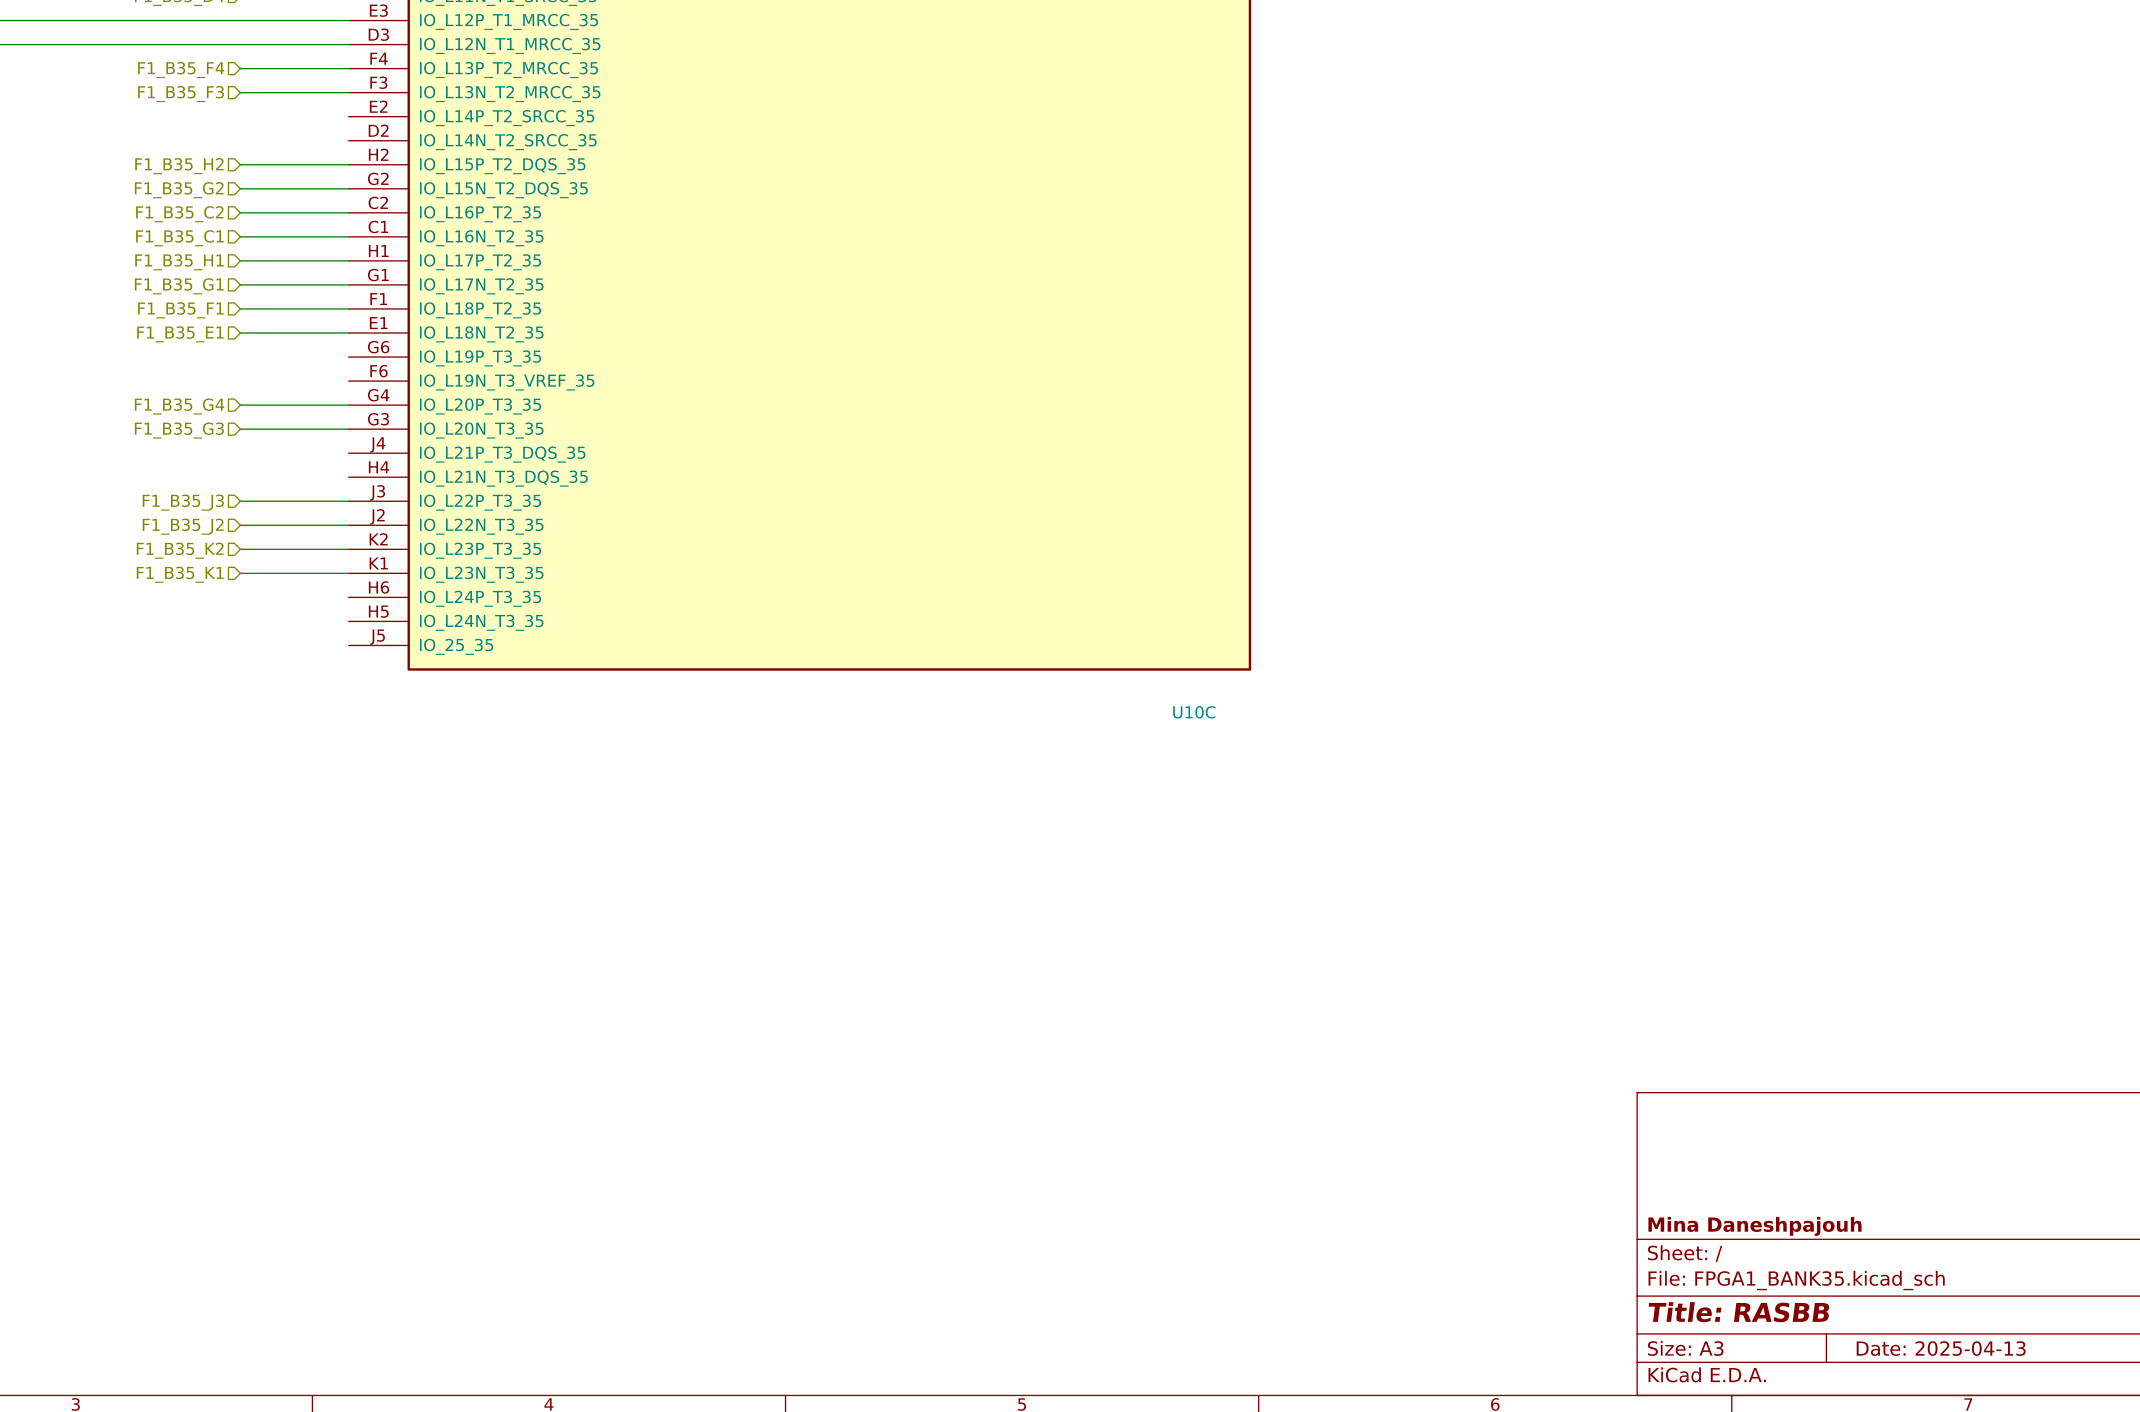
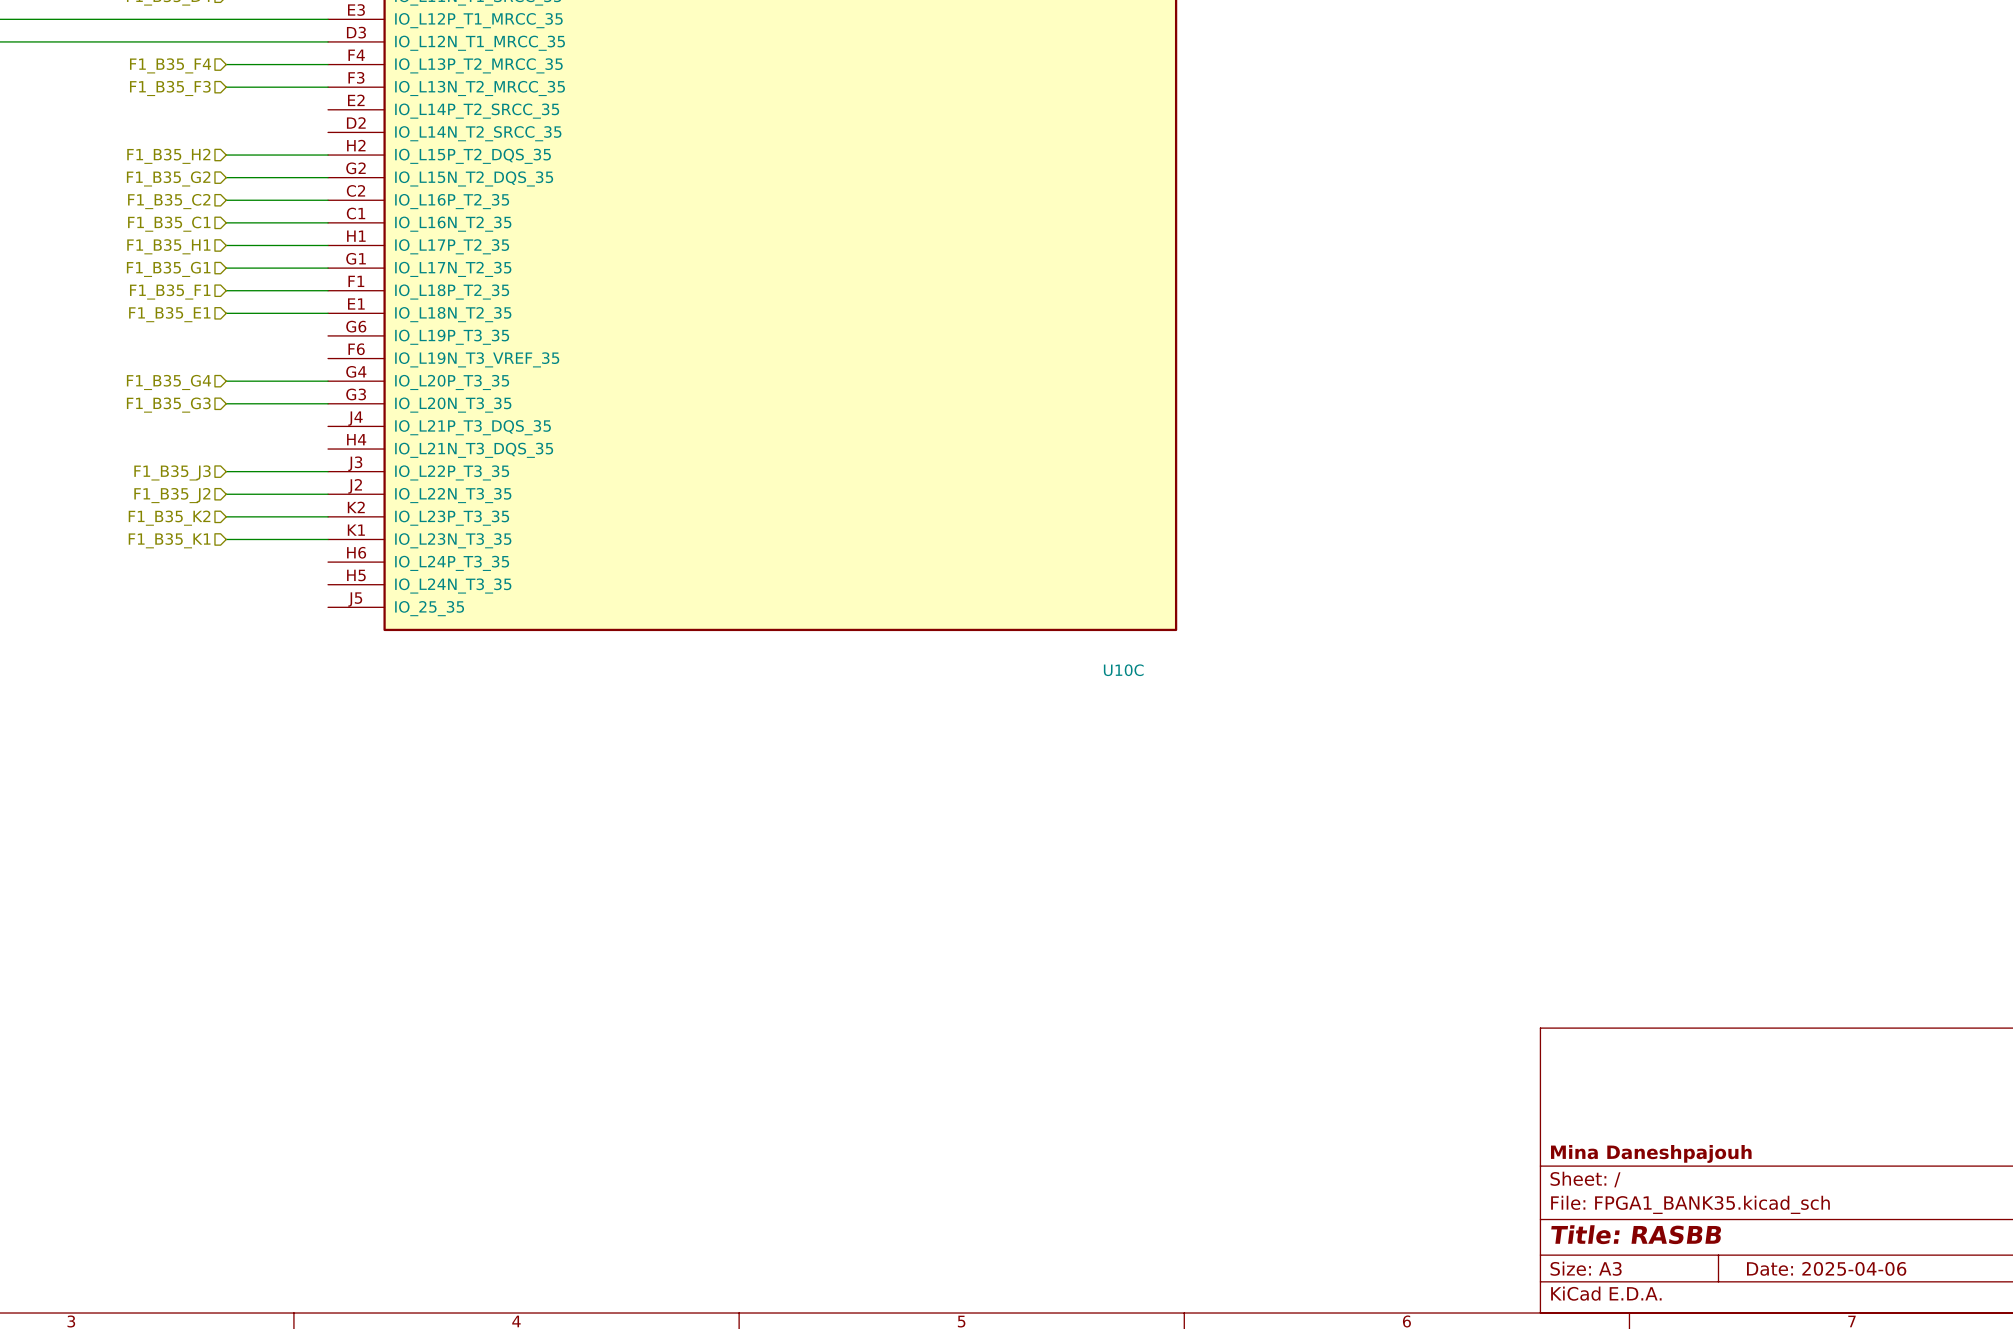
title block: Date: 2025-04-13 (1941, 1348) -> Date: 2025-04-06 (1826, 1268)

